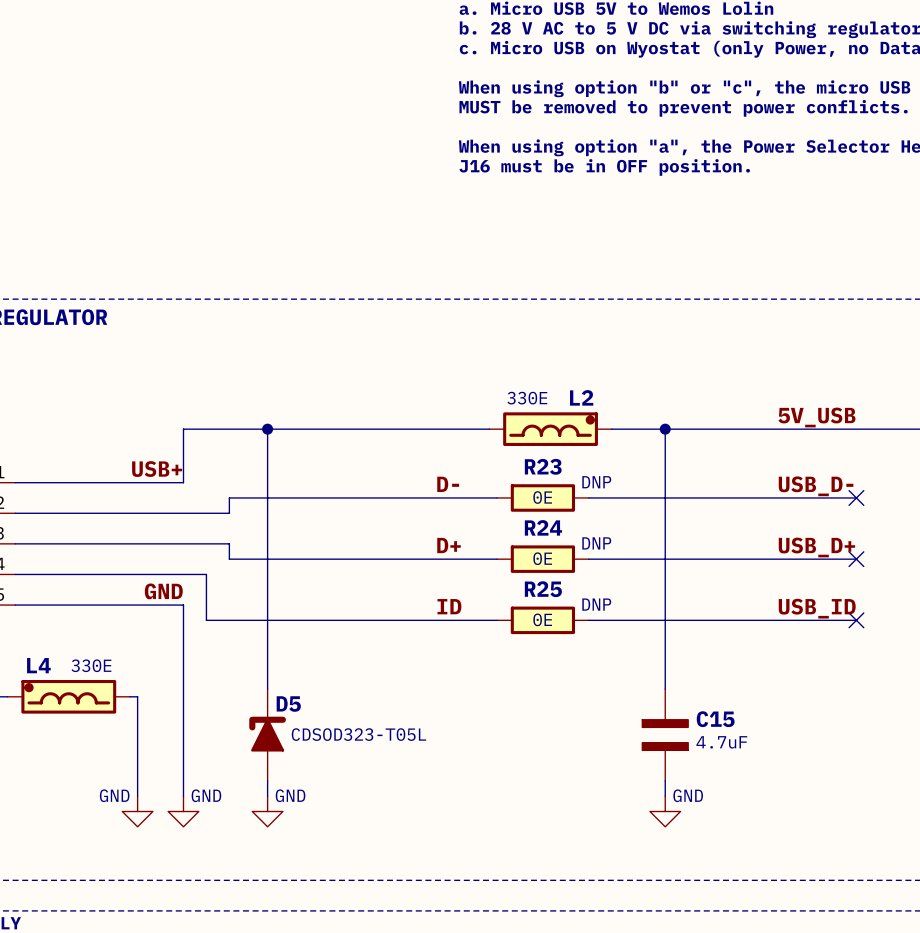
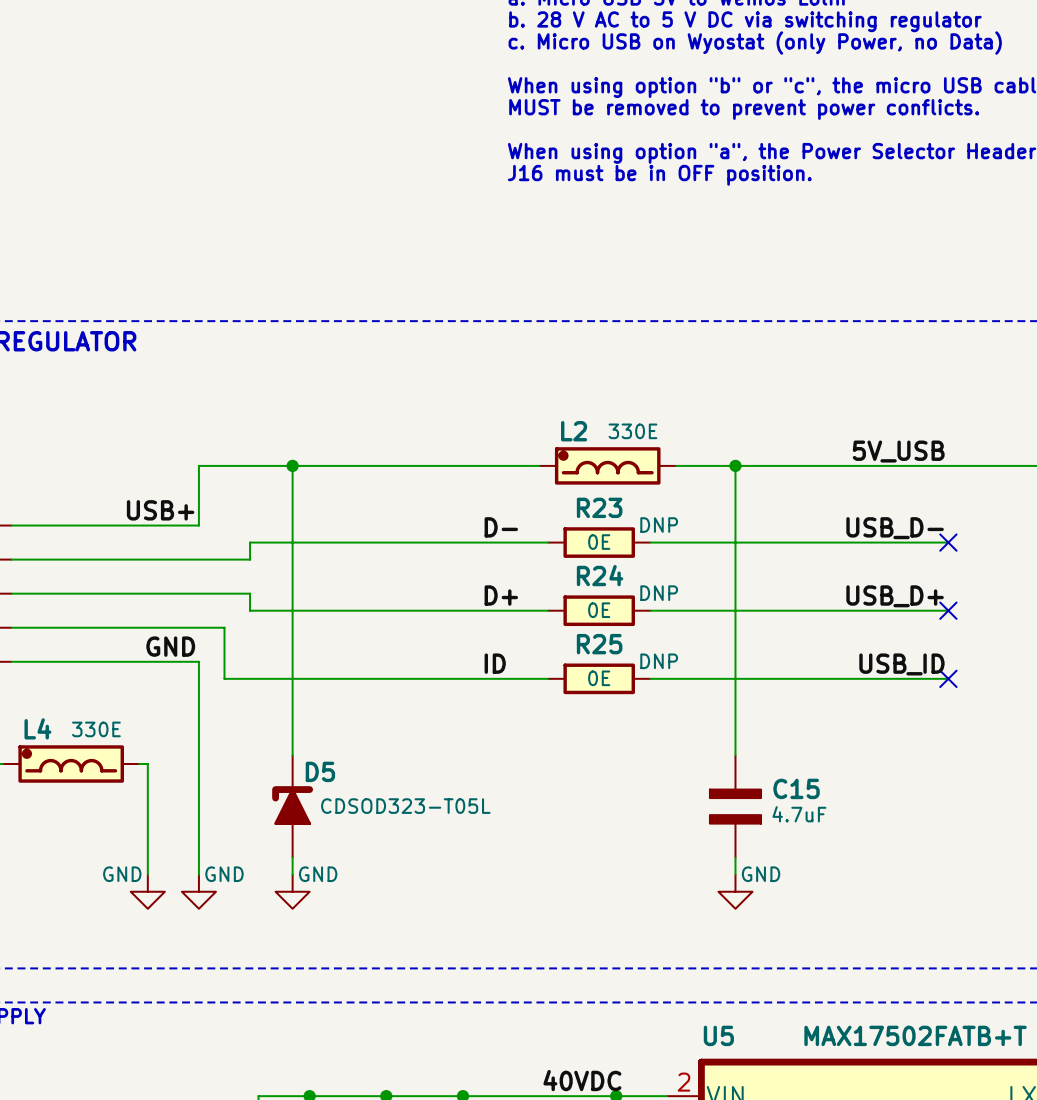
L2 flip: as is (550, 429) -> left-right (607, 465)

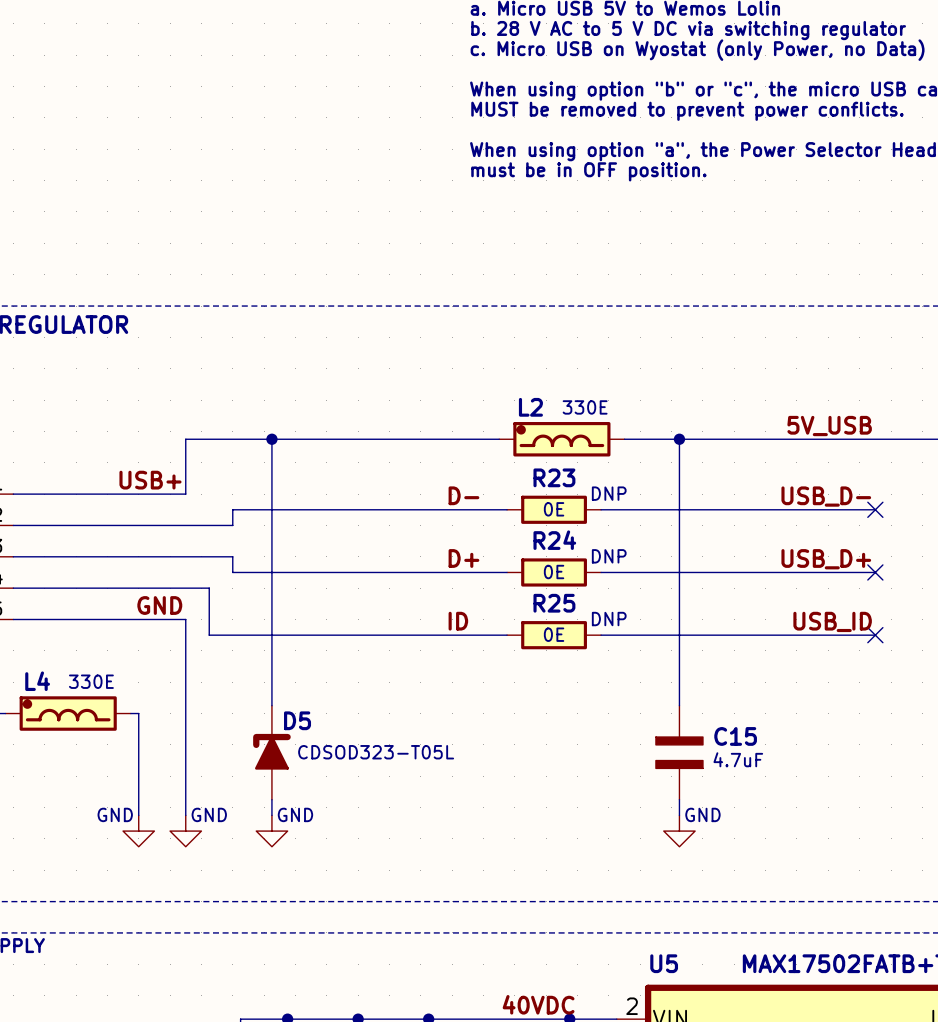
text: J16 must be in OFF position. (659, 175) -> must be in OFF position. (588, 171)

